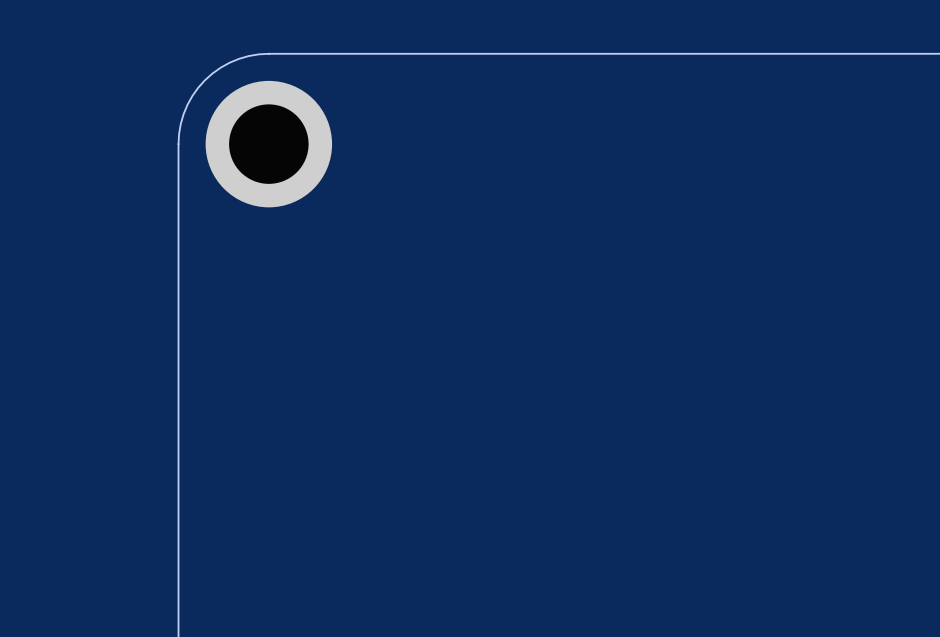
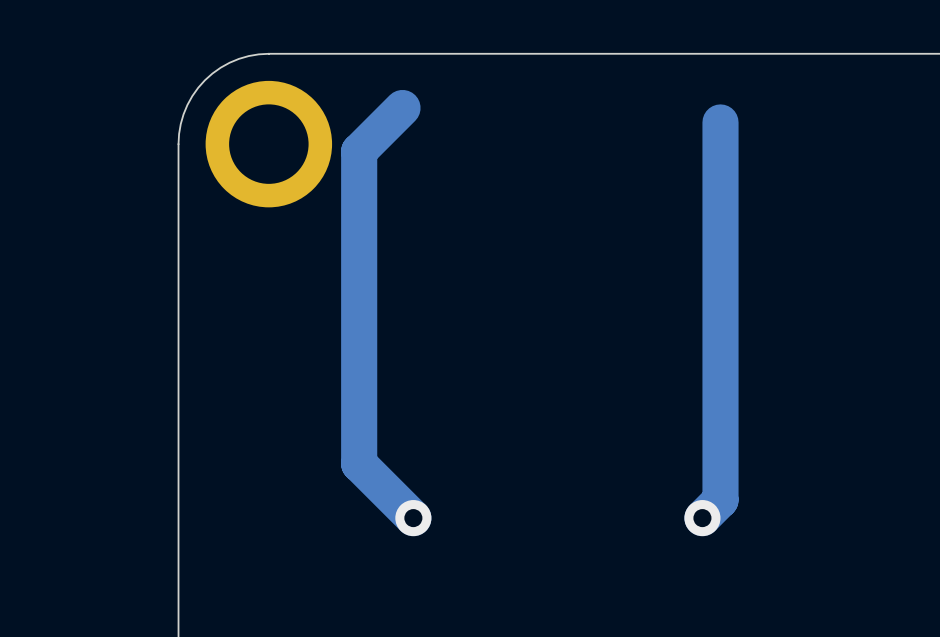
track: none -> (402, 107) (359, 151) (359, 463) (413, 518)
track: none -> (720, 122) (720, 500) (702, 518)
via: none -> (413, 518)
via: none -> (702, 518)

